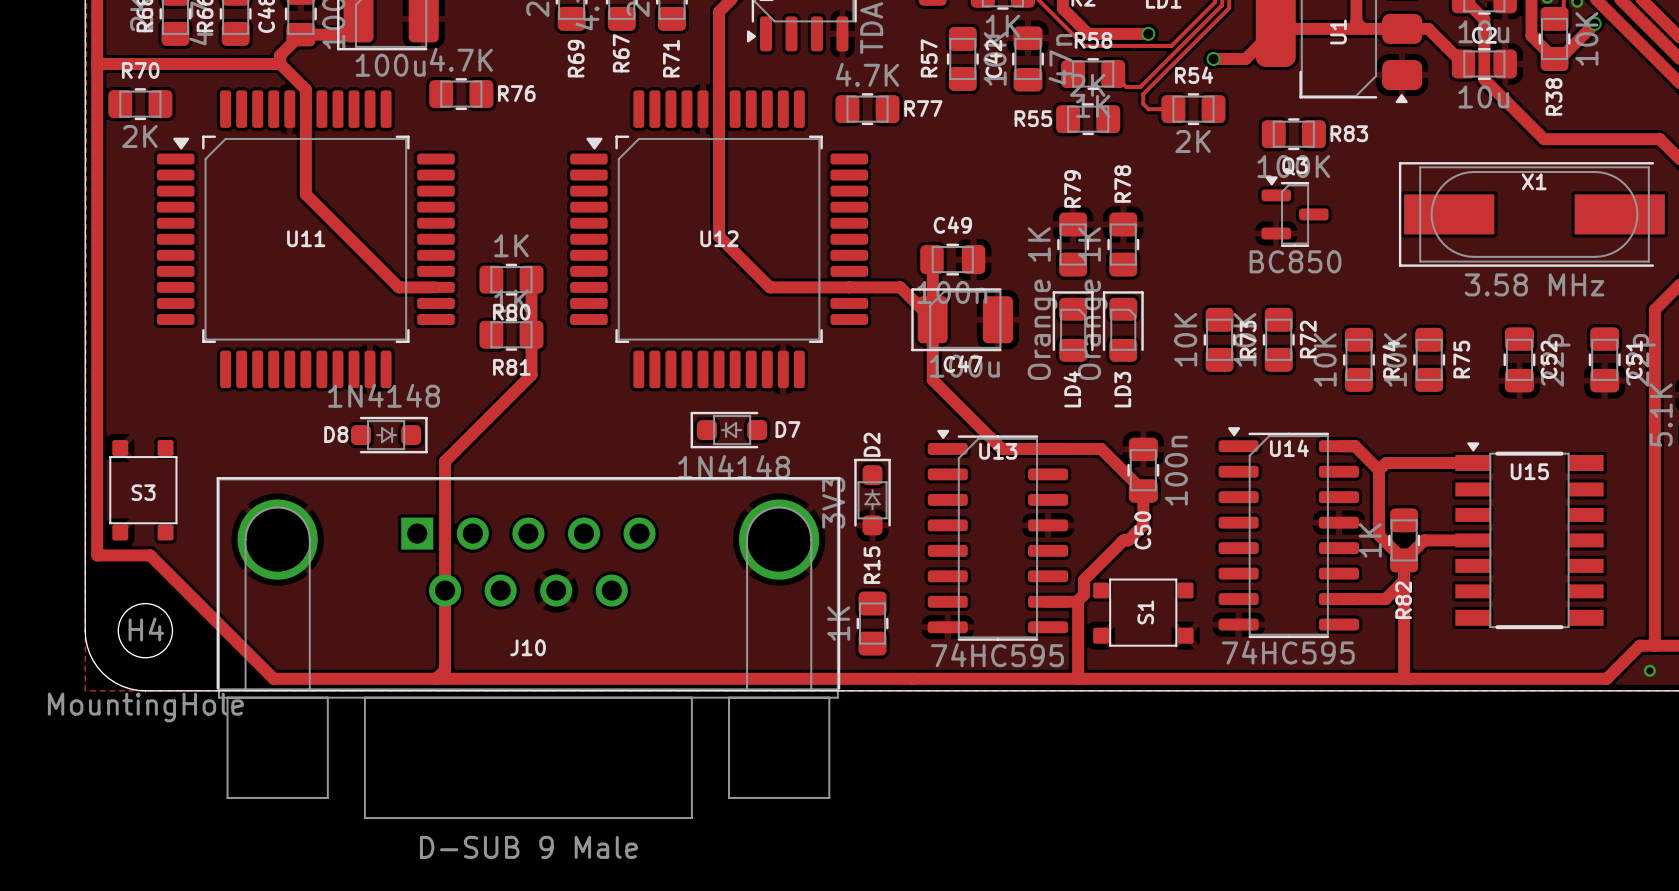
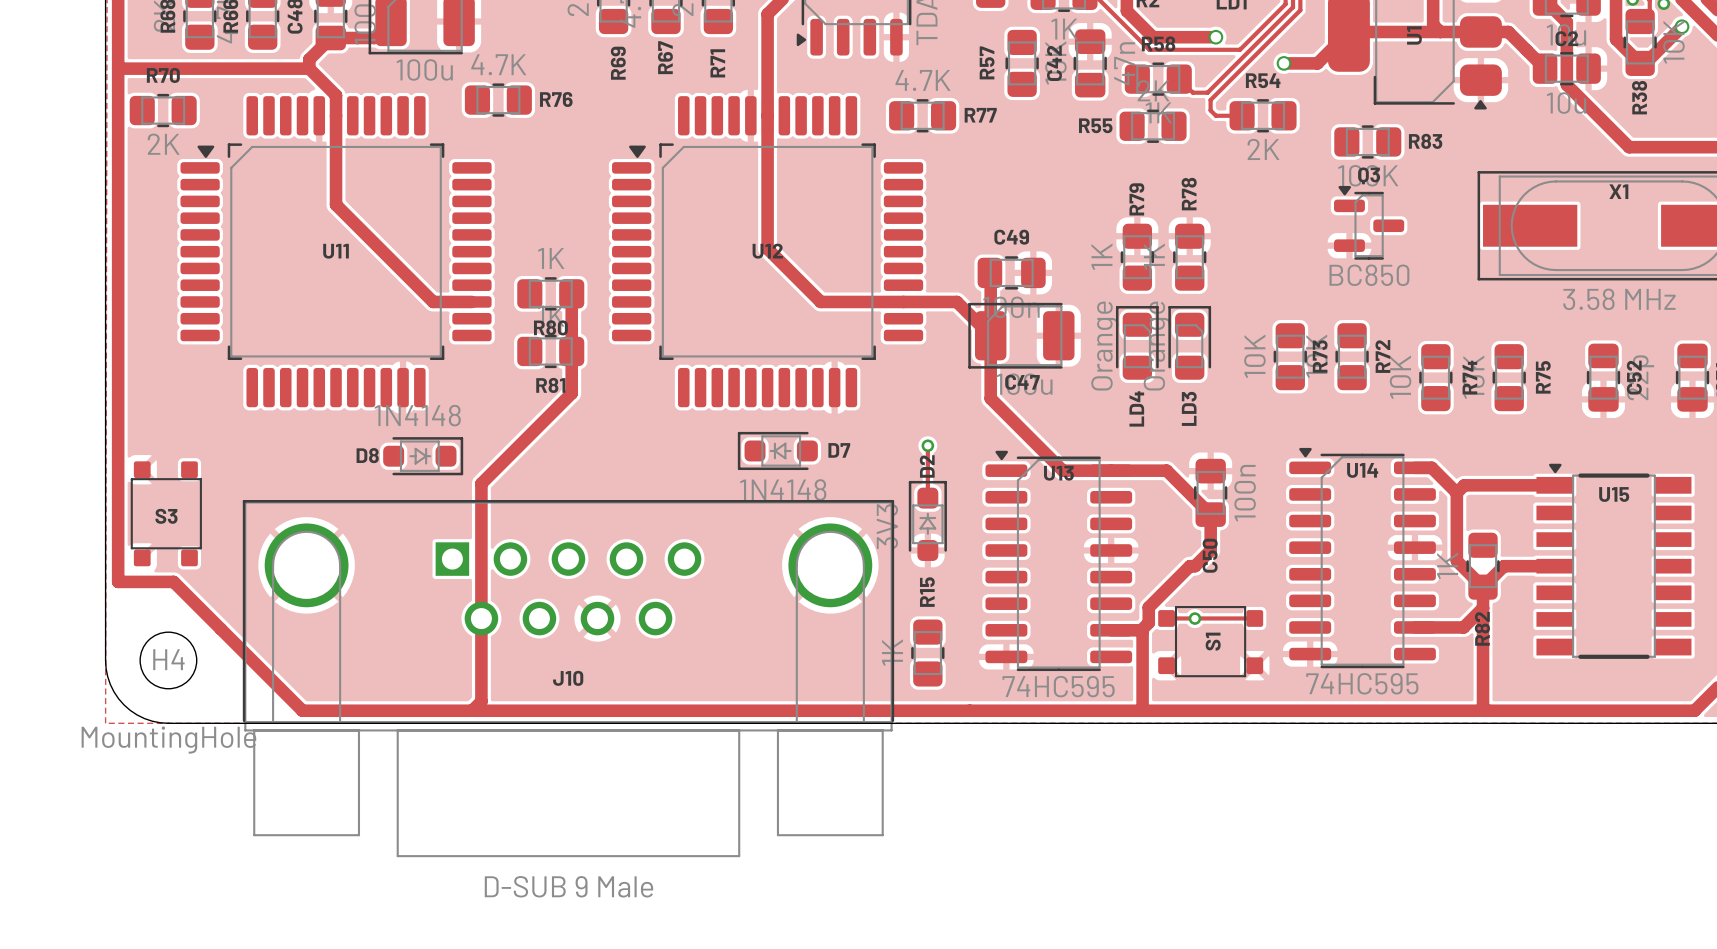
track: none -> (927, 445) (927, 498)
via: none -> (927, 445)
track: none -> (1166, 618) (1254, 618)
via: none -> (1194, 618)

